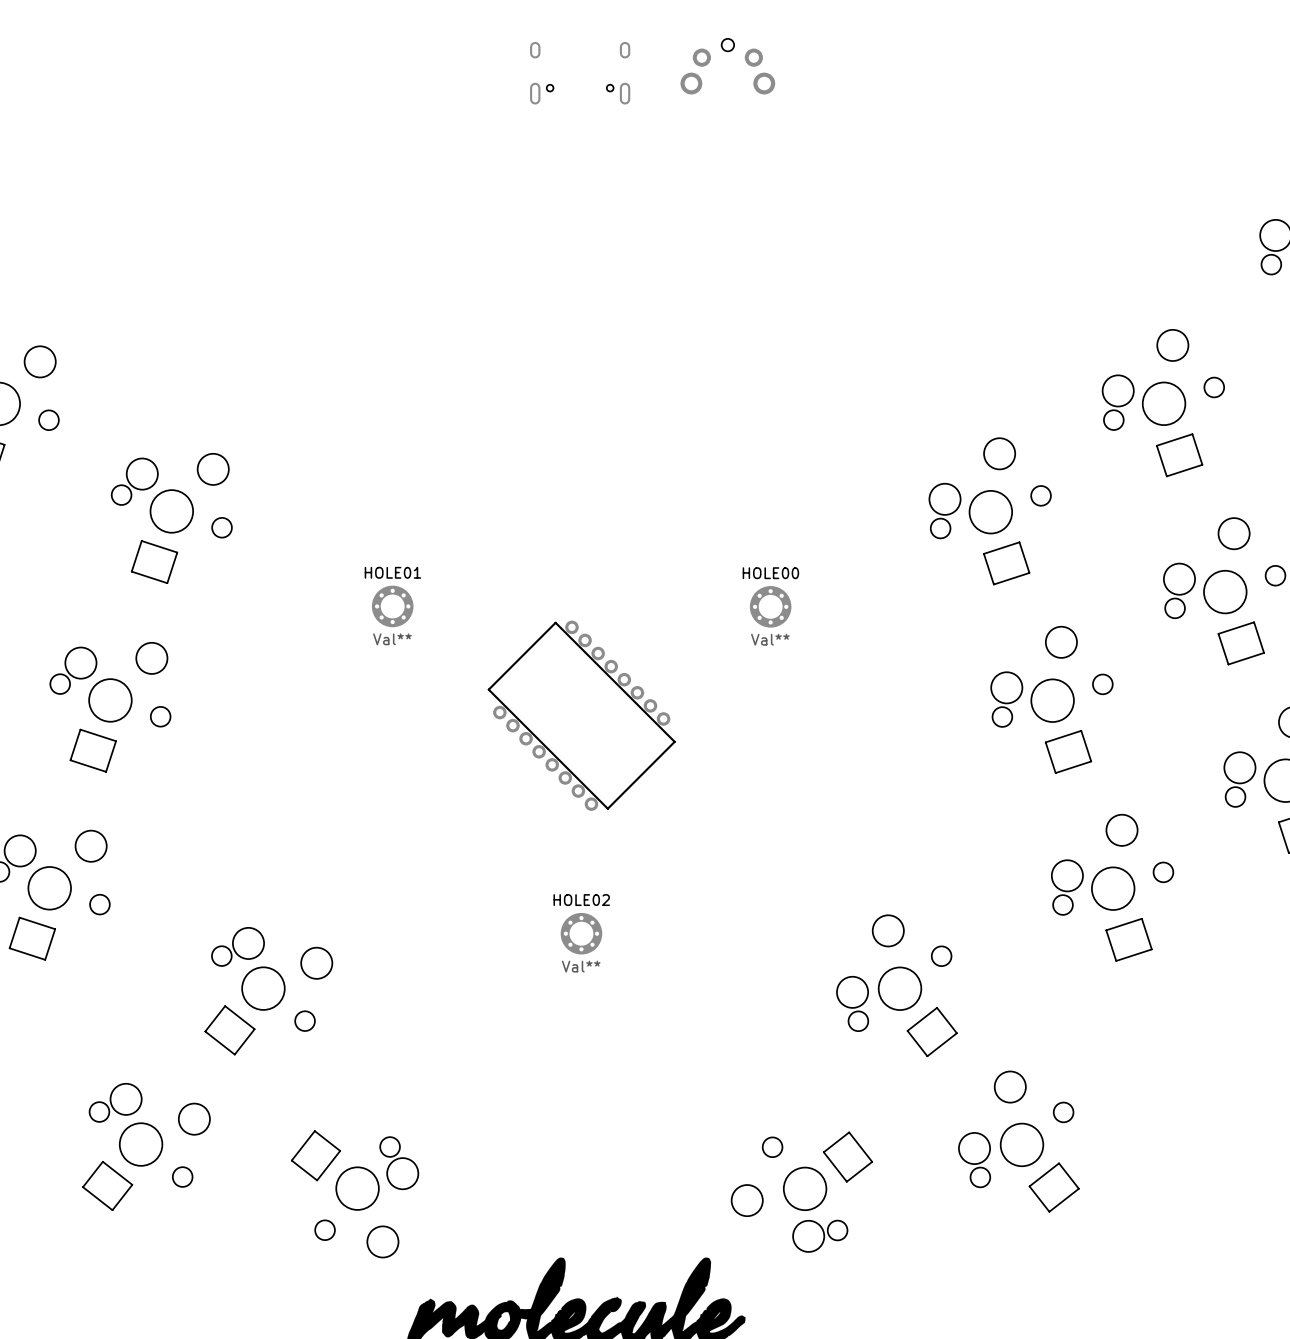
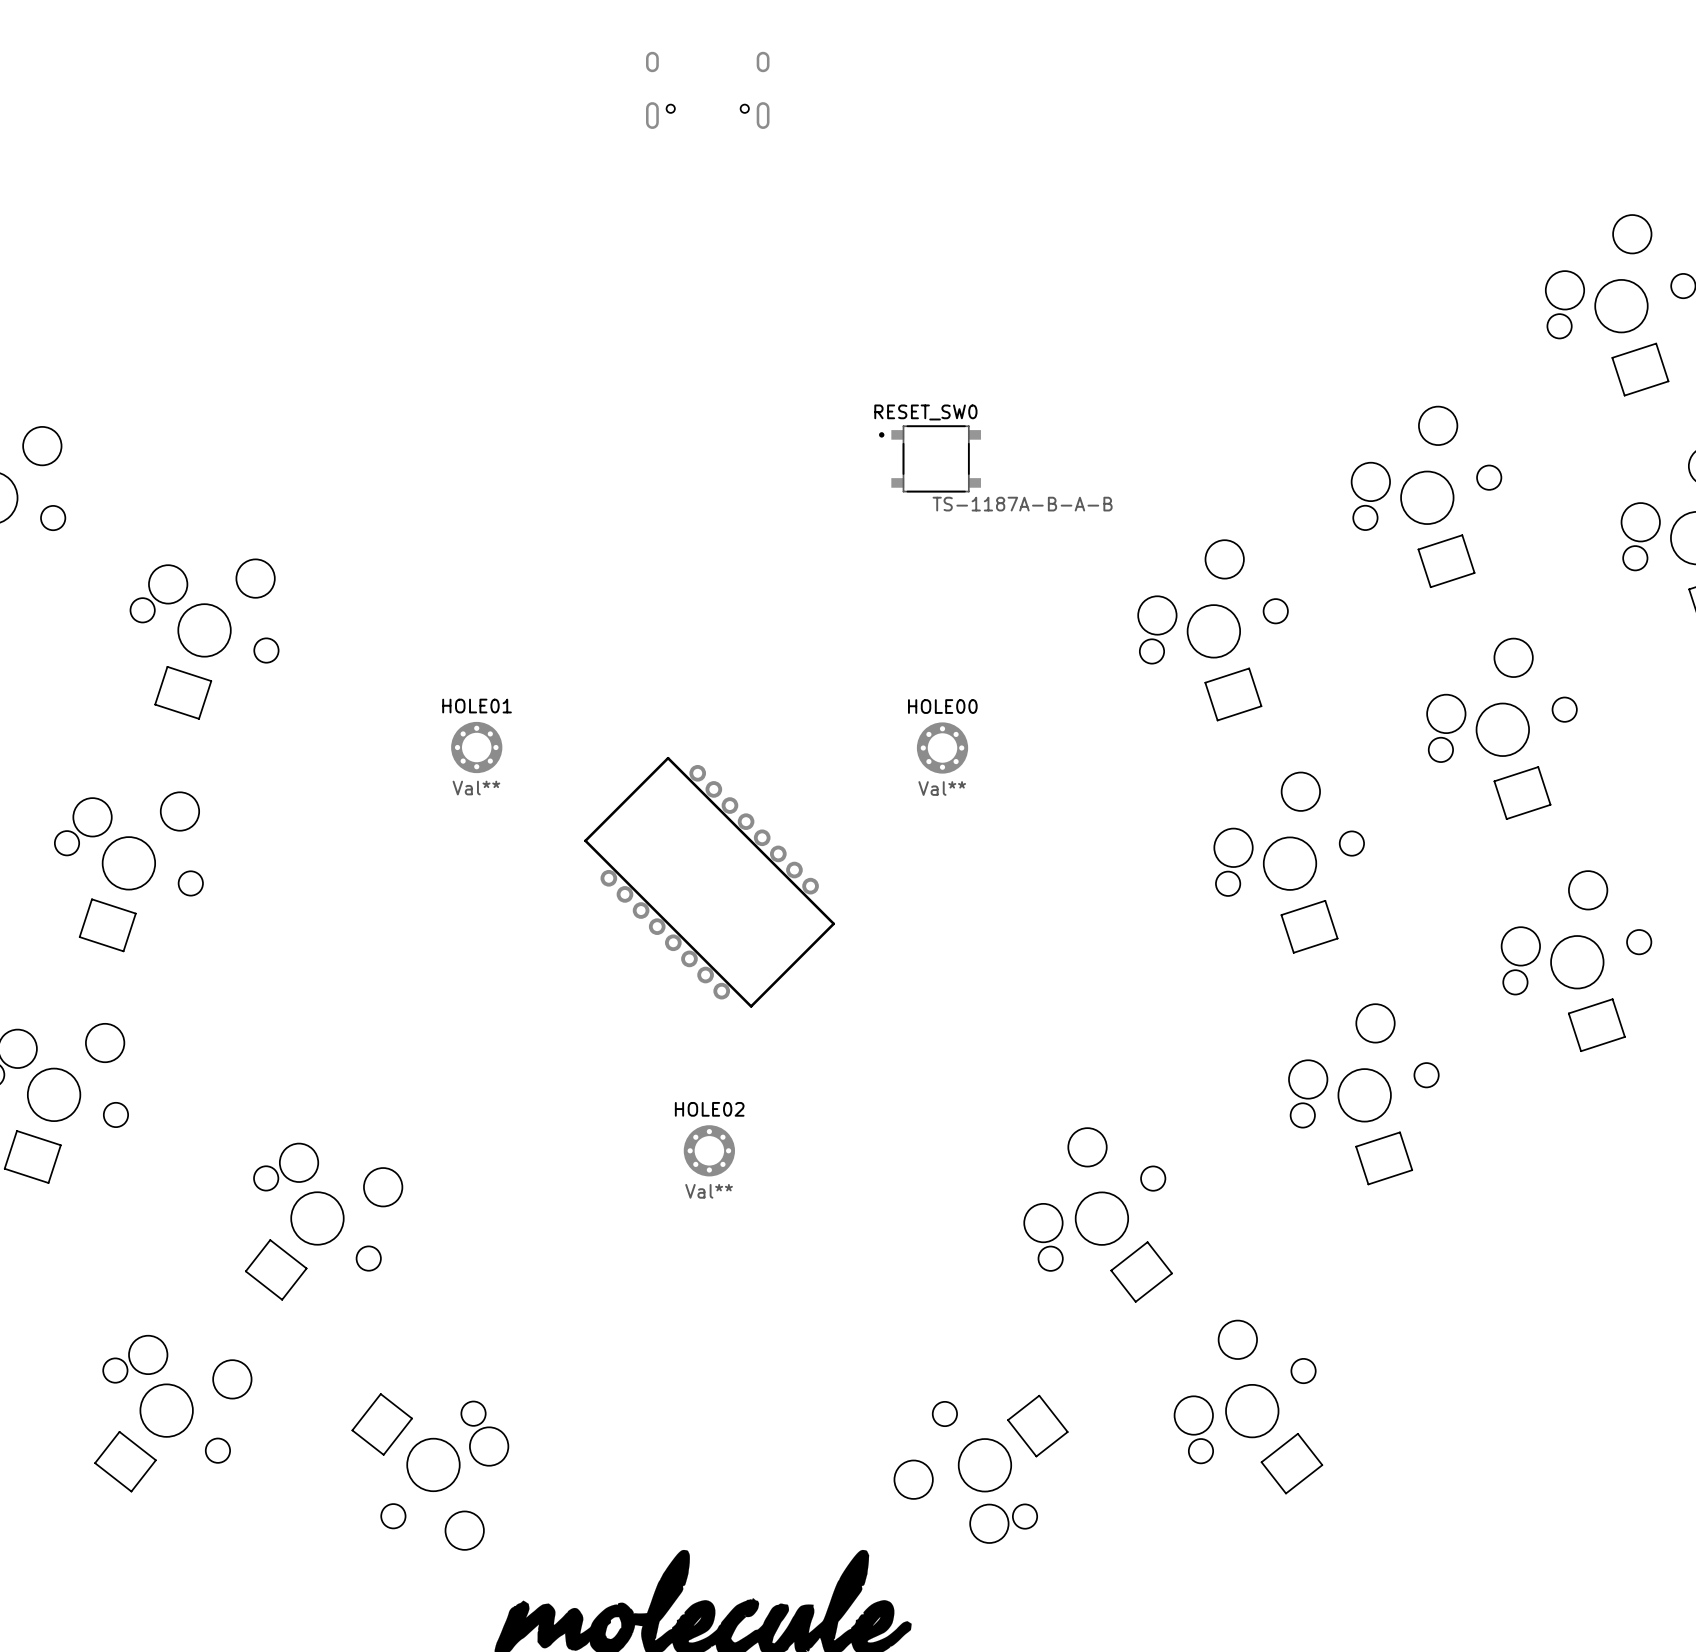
part: (727, 66) -> none
RESET_SW0: none -> TS-1187A-B-A-B (930, 458)
part footprint: [487, 620, 676, 811] -> [584, 756, 836, 1008]

